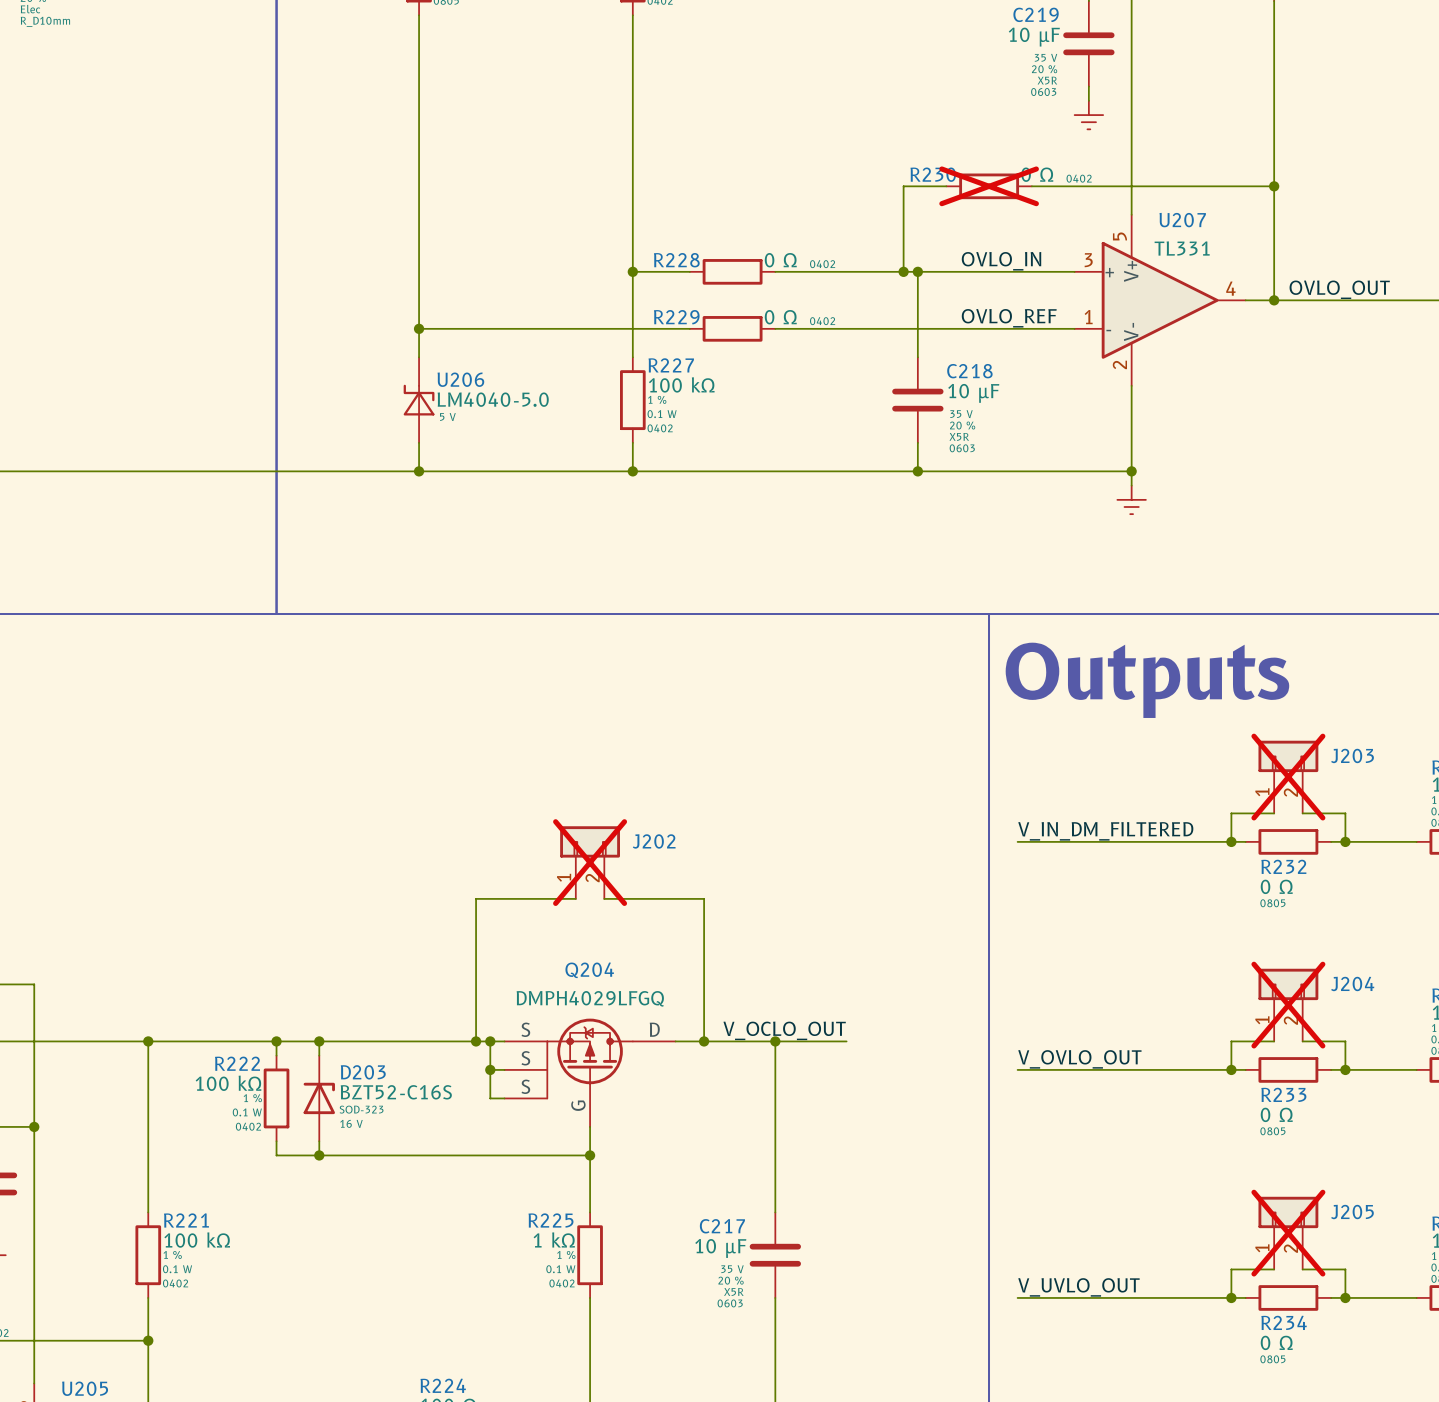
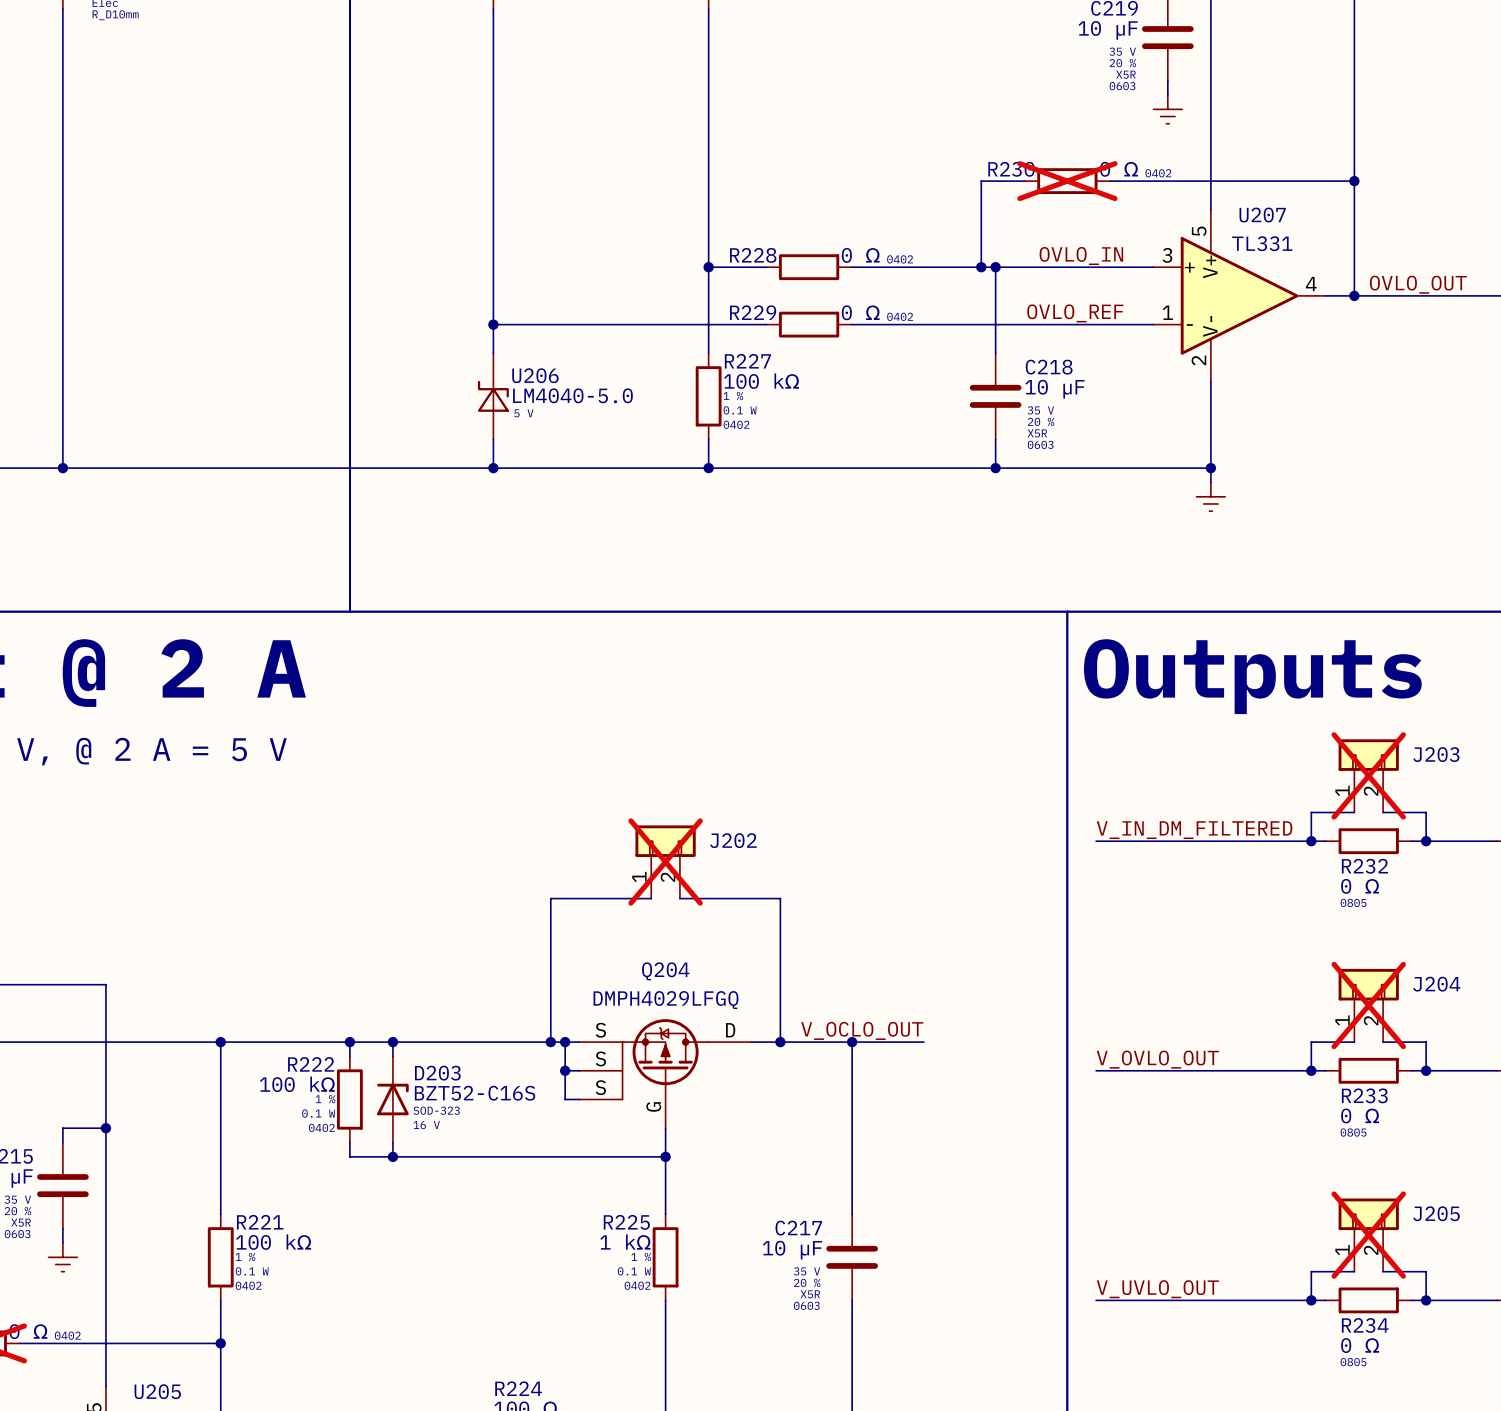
label position: OVLO_IN (1001, 261) -> OVLO_IN (1081, 256)
label position: OVLO_REF (1009, 318) -> OVLO_REF (1075, 313)

